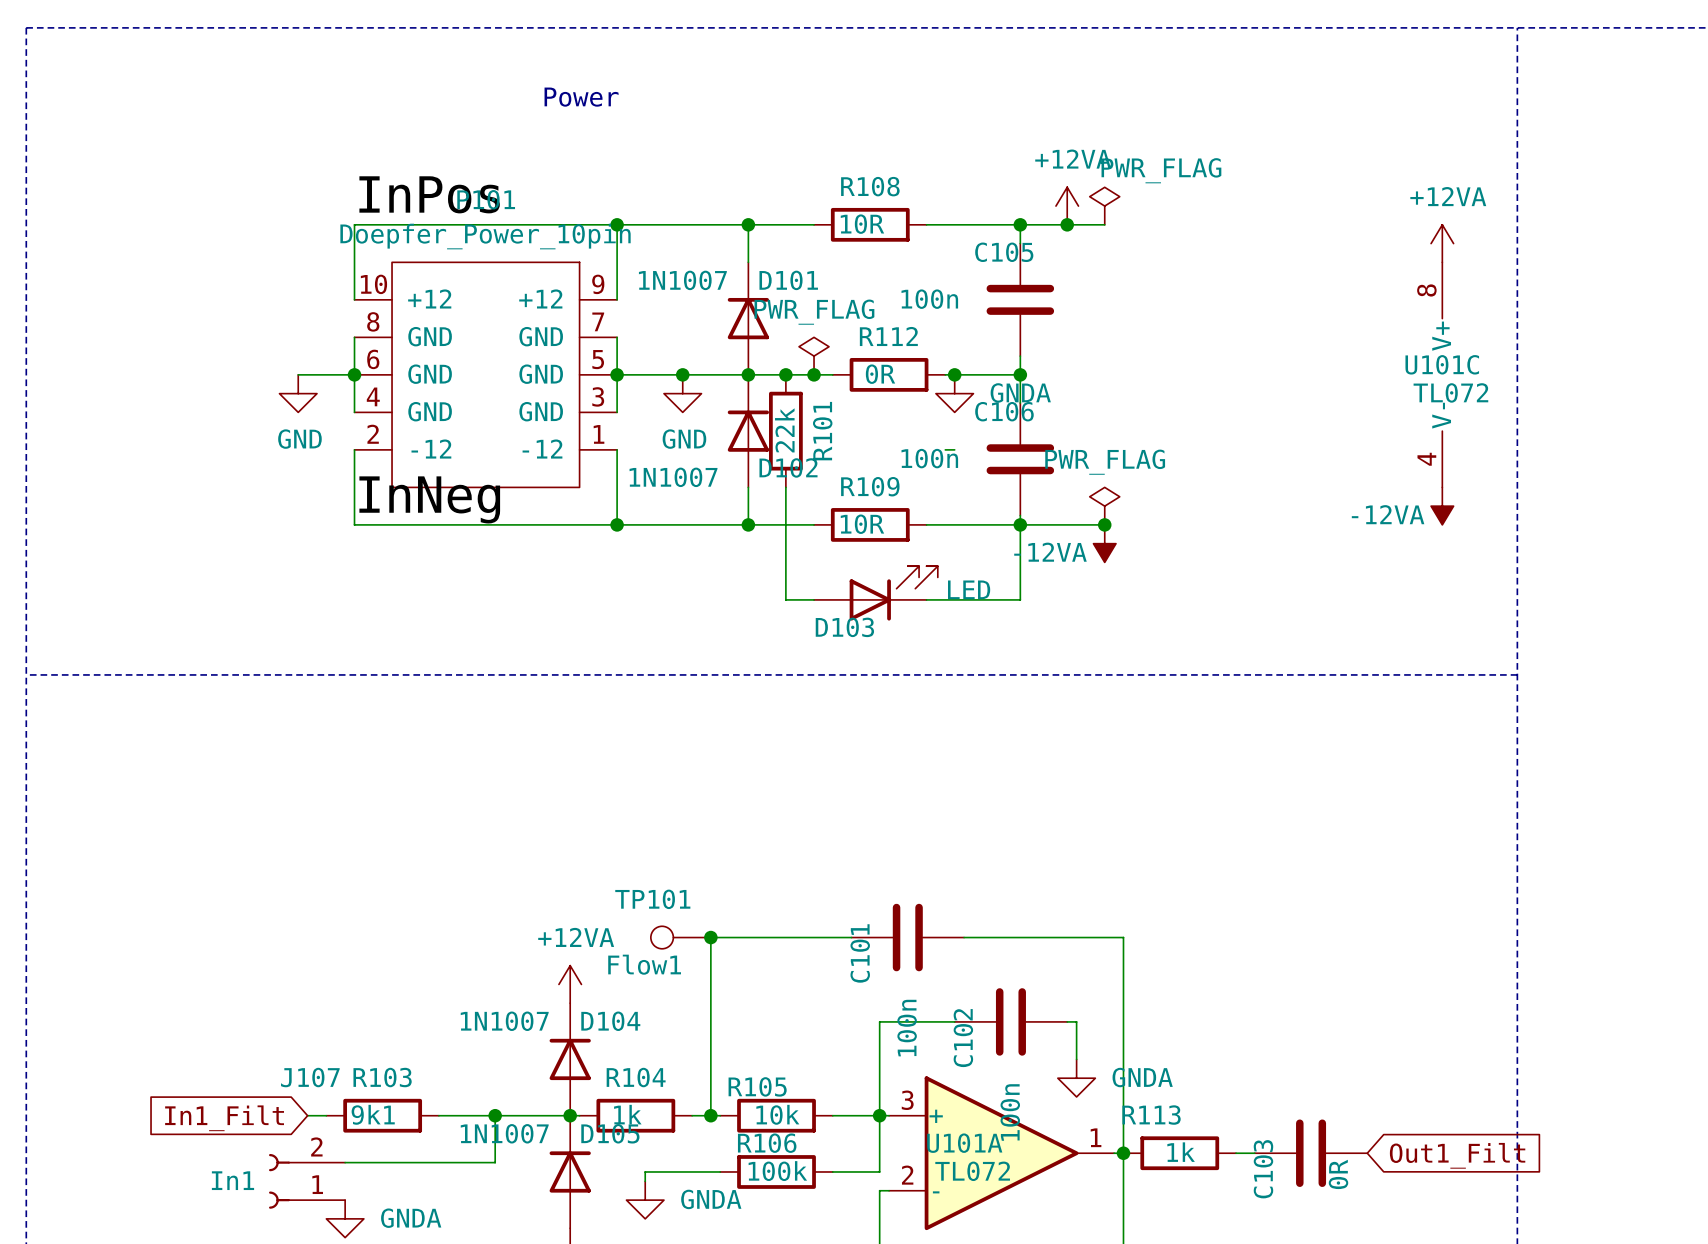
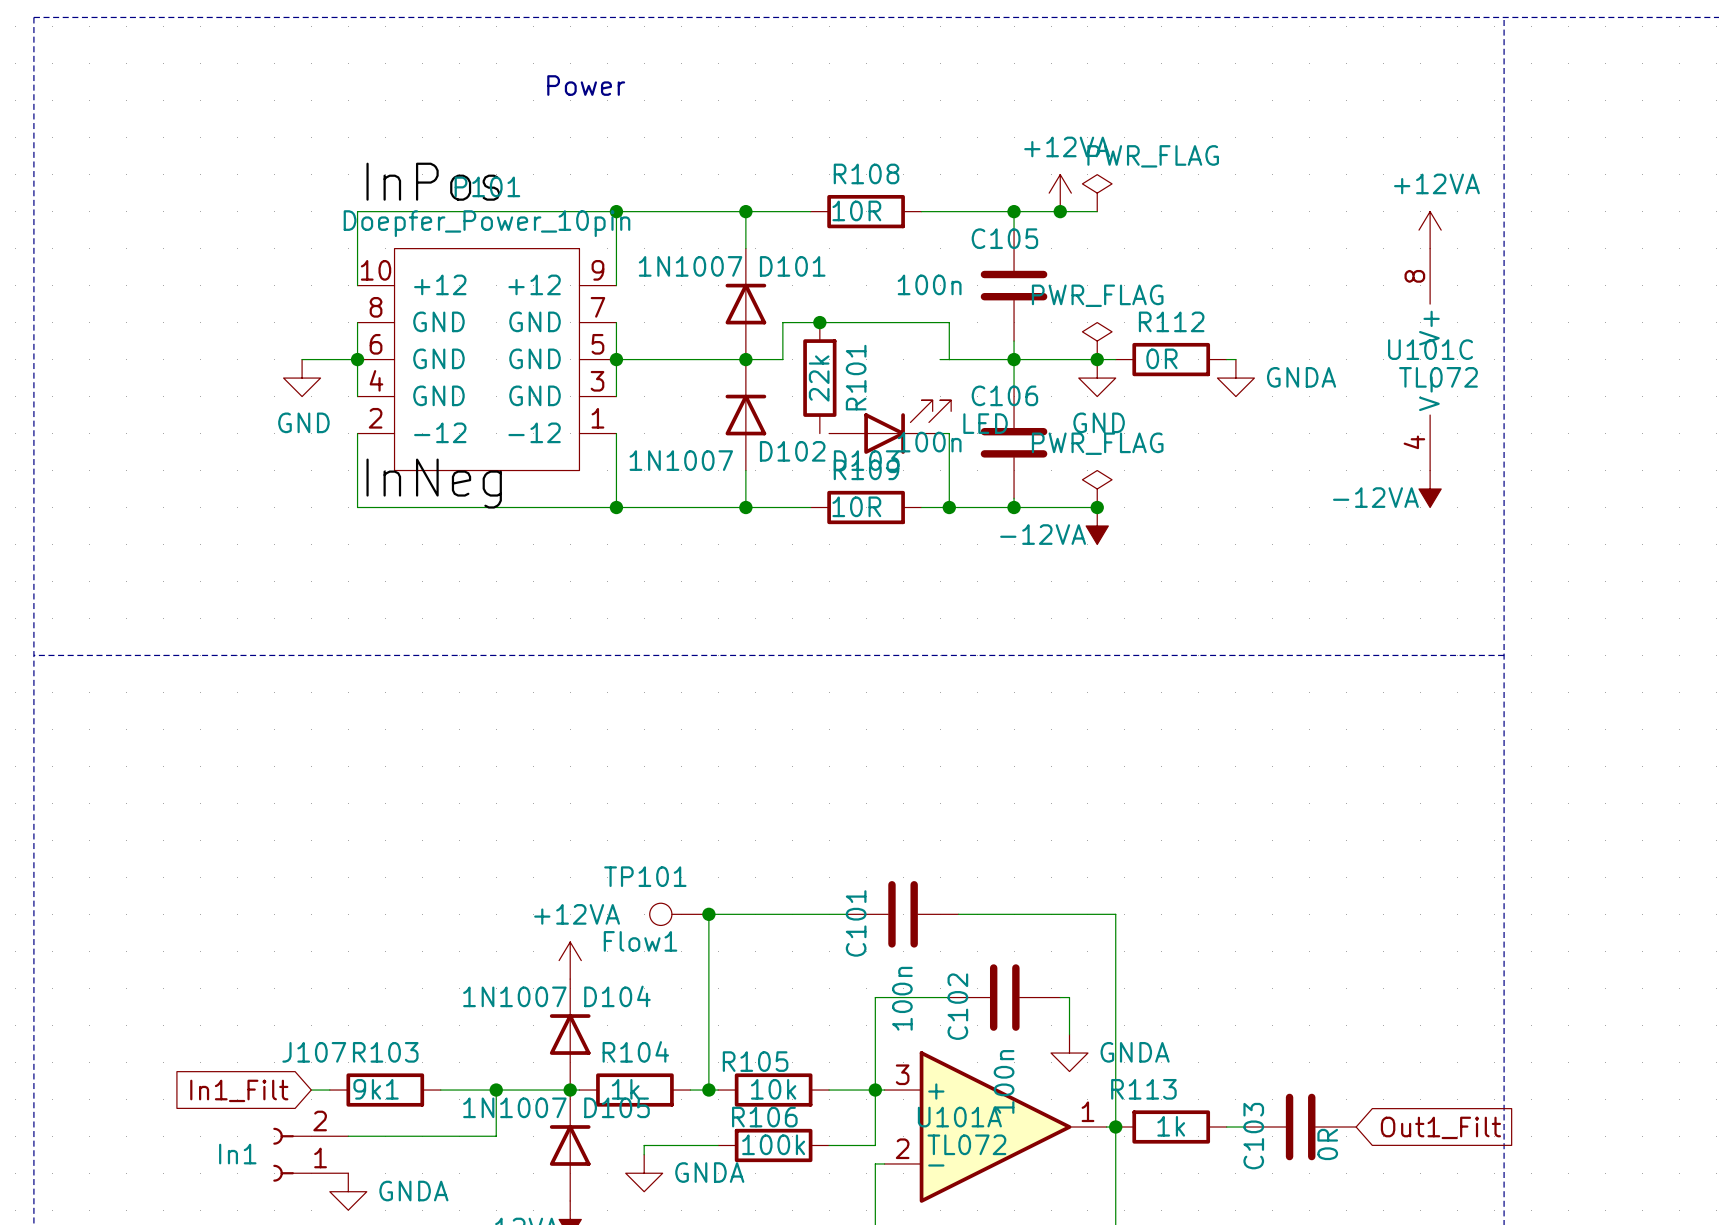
junction: none -> (819, 322)
power symbol position: PWR_FLAG (814, 356) -> PWR_FLAG (1097, 341)
junction: (682, 374) -> none
wire: (785, 374) (832, 374) -> (782, 359) (782, 322) (949, 322) (949, 359)
junction: (785, 374) -> none
junction: (814, 374) -> none
R112 position: (889, 374) -> (1171, 359)
junction: (954, 374) -> none
wire: none -> (1014, 359) (1115, 359)
junction: none -> (1097, 359)
wire: none -> (1226, 359) (1235, 359)
power symbol: GND (682, 393) -> none
power symbol position: GNDA (954, 393) -> GNDA (1235, 378)
power symbol: none -> GND (1097, 378)
R101 position: (785, 431) -> (819, 378)
wire: none -> (949, 433) (949, 507)
wire: (785, 487) (785, 599) (814, 599) -> none
junction: none -> (949, 507)
wire: (1020, 524) (1020, 599) (926, 599) -> none
D103 position: (875, 593) -> (890, 427)

